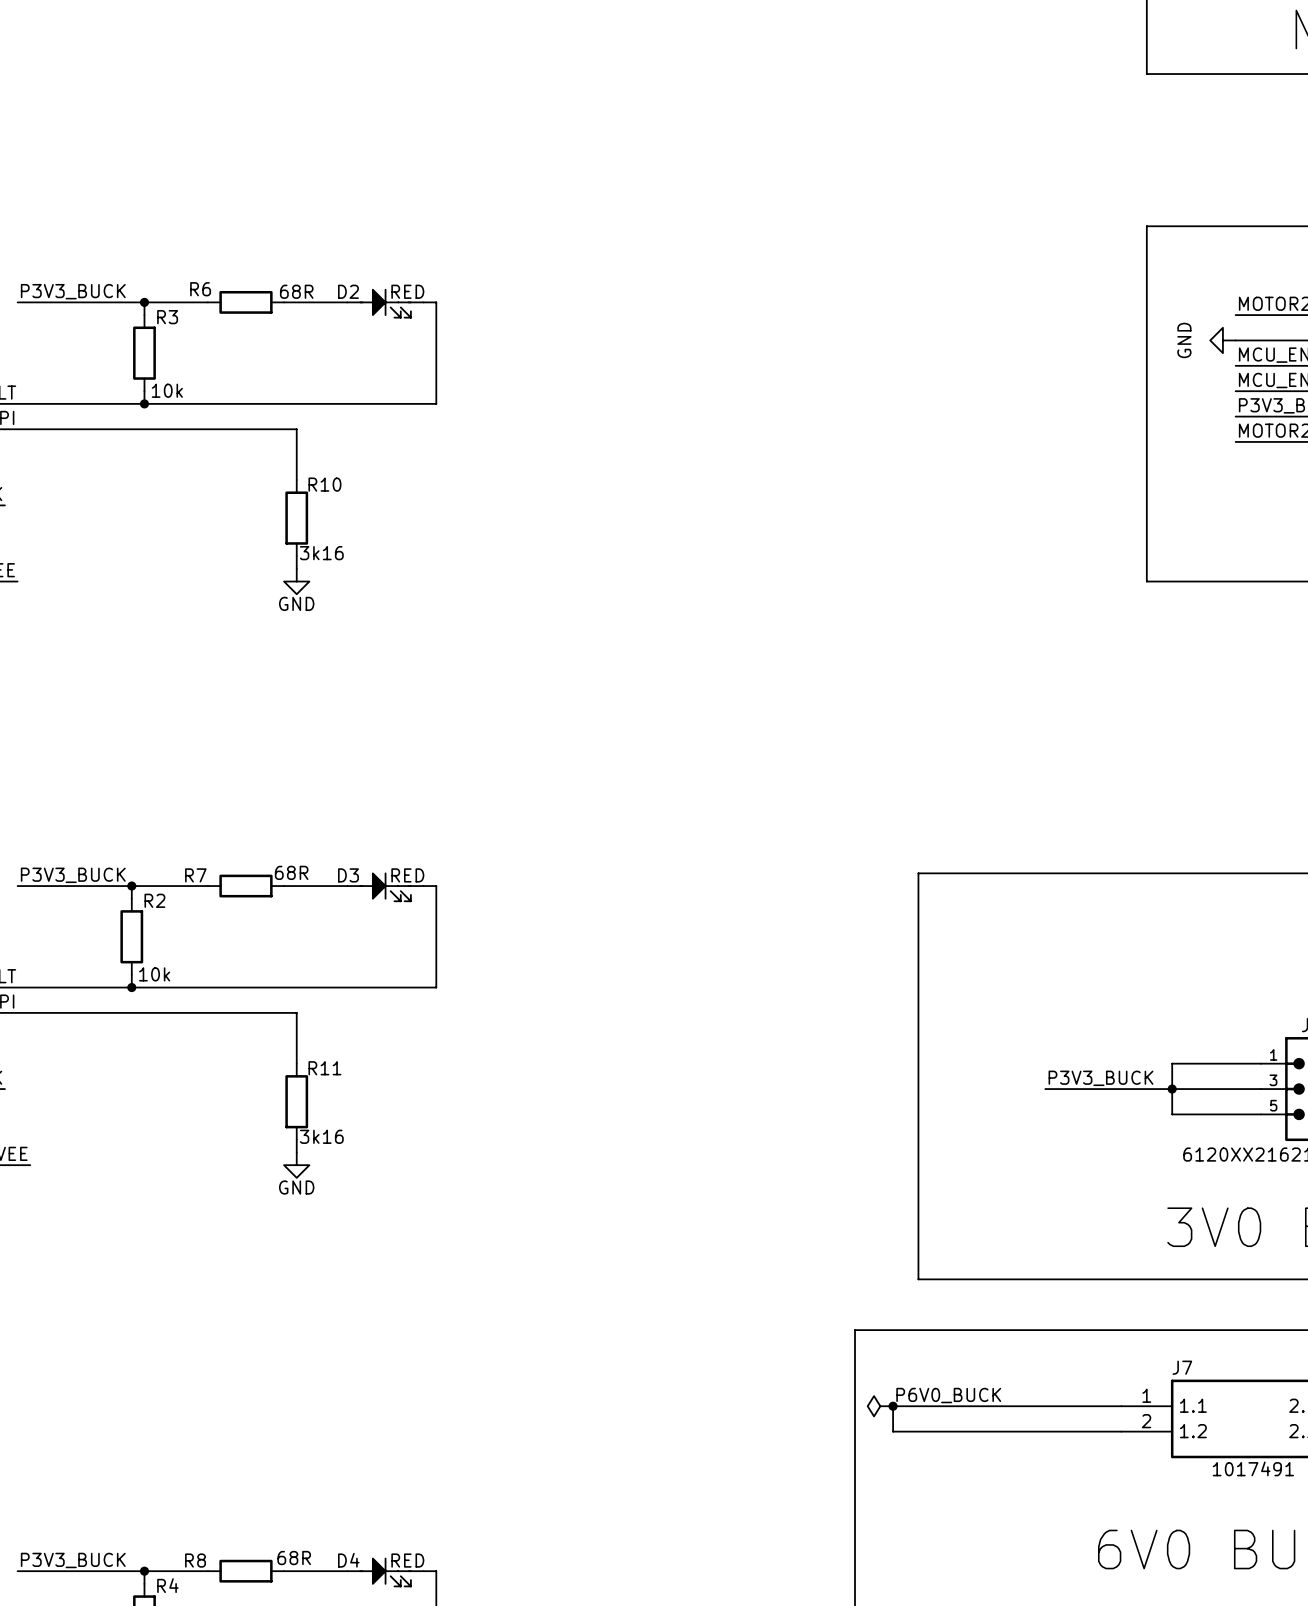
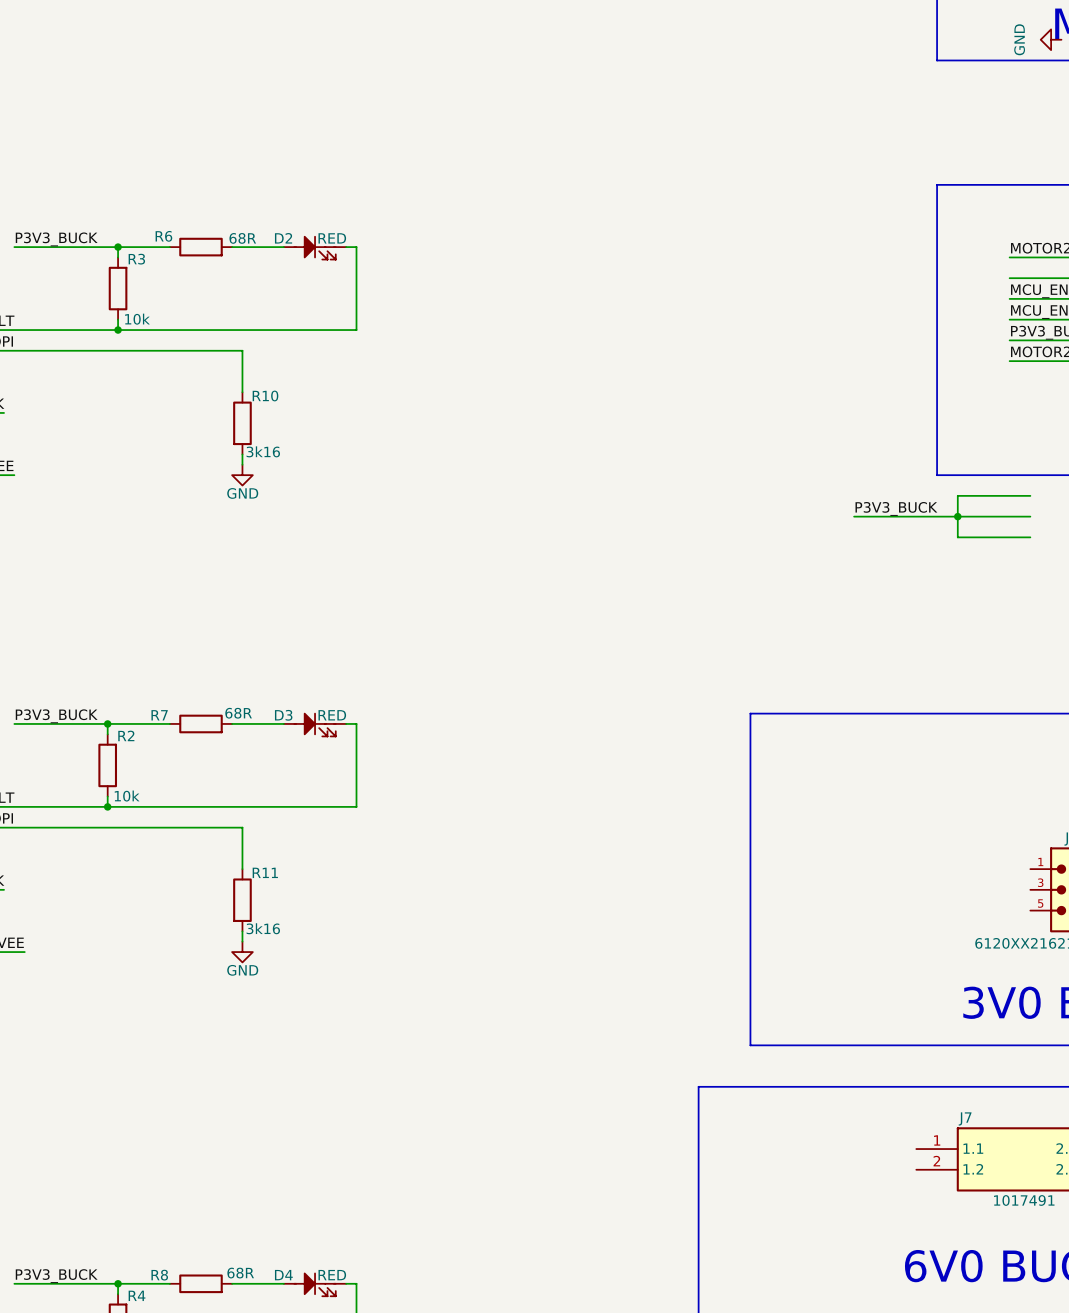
power symbol: none -> GND (1051, 39)
power symbol: GND (1222, 340) -> none
wire: none -> (1030, 495) (957, 495) (957, 537) (1030, 537)
label: none -> P3V3_BUCK (896, 508)
wire: none -> (854, 516) (1030, 516)
junction: none -> (957, 516)
wire: (1261, 1063) (1172, 1063) (1172, 1114) (1261, 1114) -> none
label: P3V3_BUCK (1101, 1078) -> none
wire: (1045, 1089) (1261, 1089) -> none
junction: (1172, 1089) -> none
label: P6V0_BUCK (948, 1395) -> none
power symbol: (880, 1406) -> none
junction: (893, 1406) -> none
wire: (1121, 1406) (893, 1406) (893, 1431) (1121, 1431) -> none

